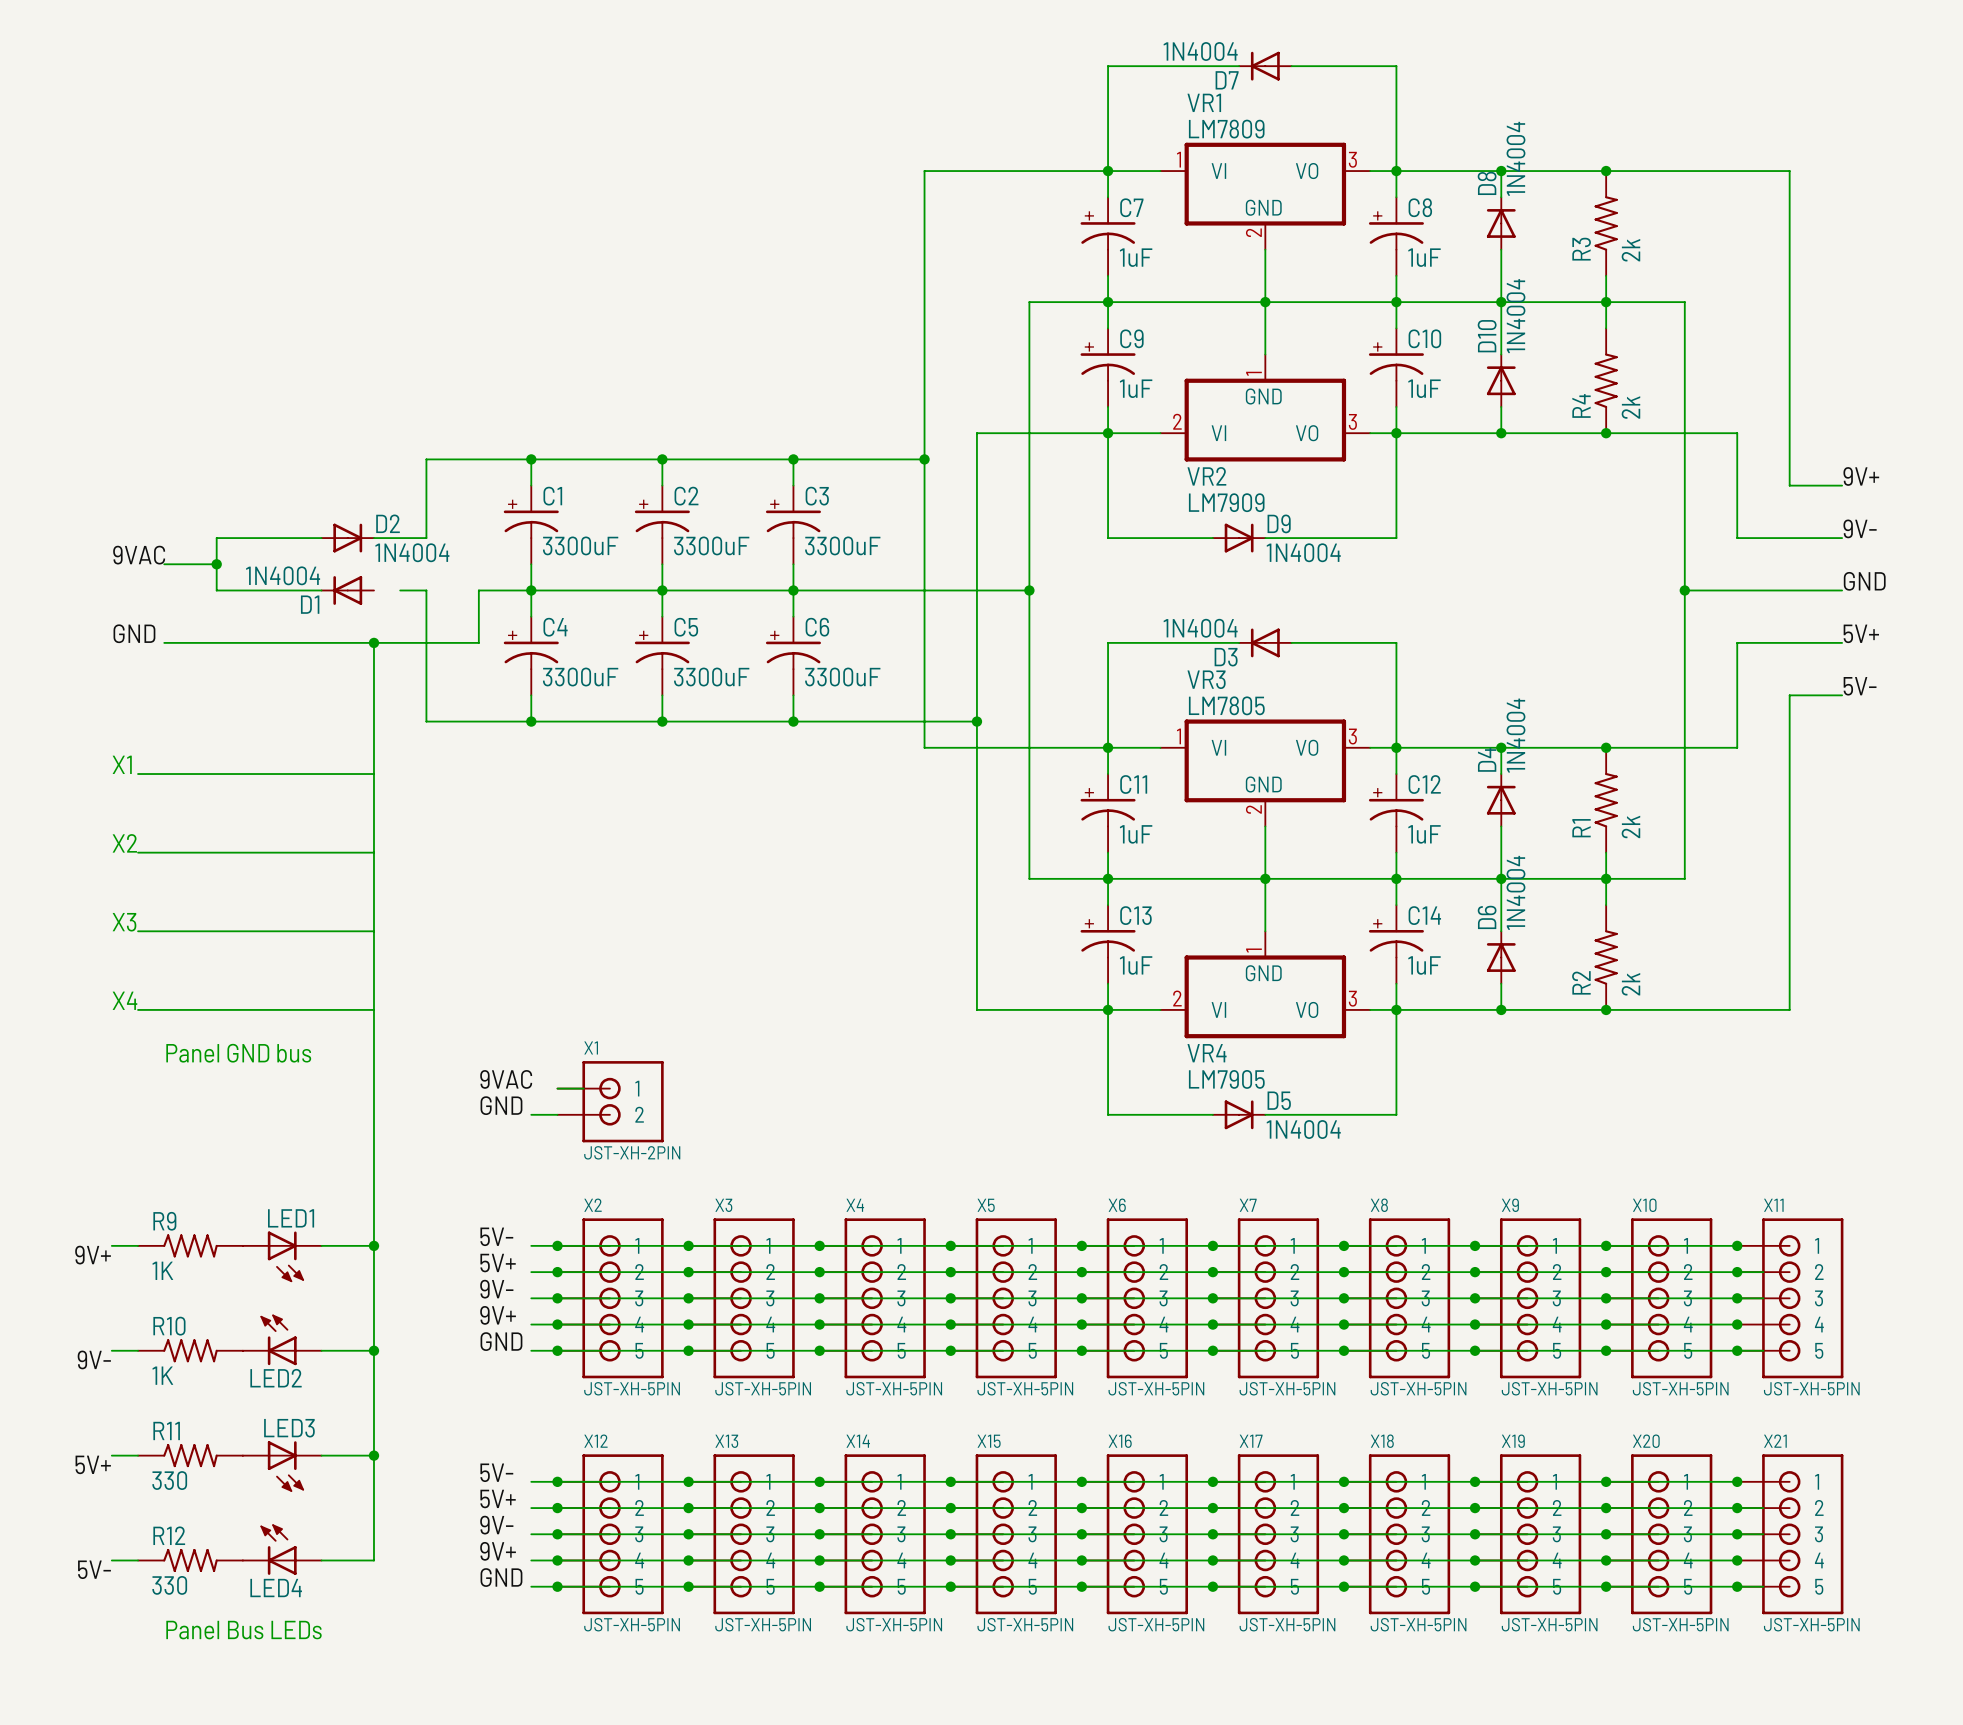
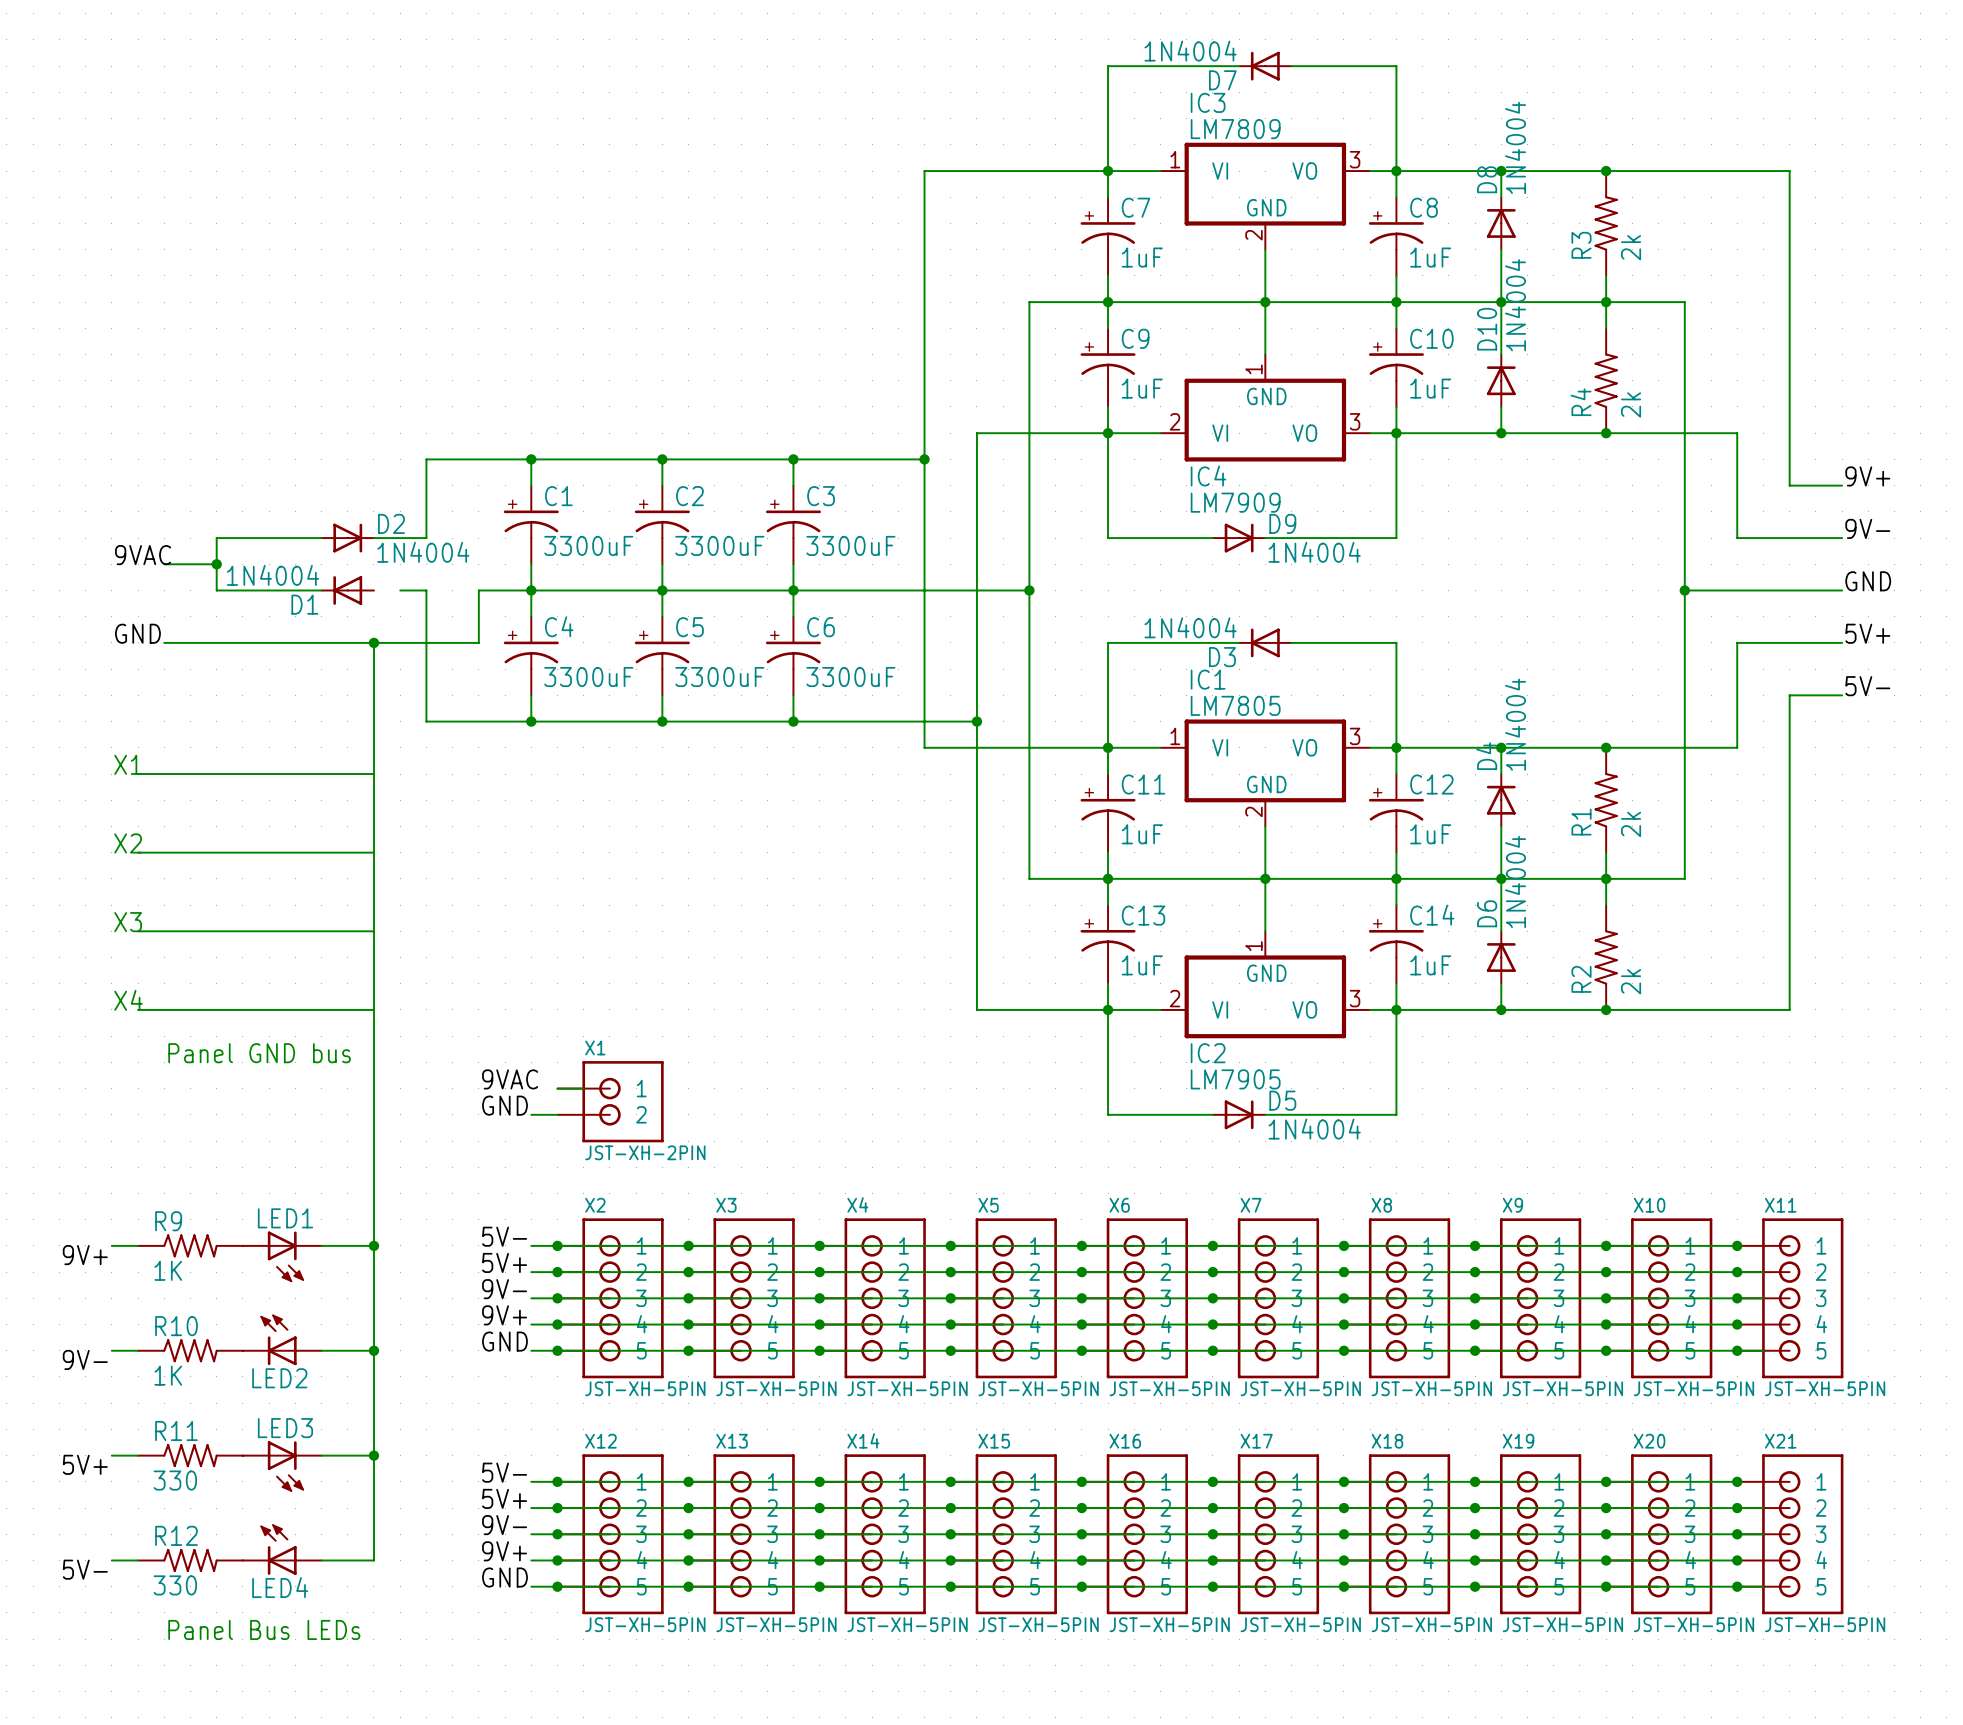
VR1 name: VR1 (1204, 102) -> IC3 (1208, 102)
VR2 name: VR2 (1206, 476) -> IC4 (1208, 476)
VR3 name: VR3 (1206, 679) -> IC1 (1208, 679)
VR4 name: VR4 (1207, 1053) -> IC2 (1208, 1053)

